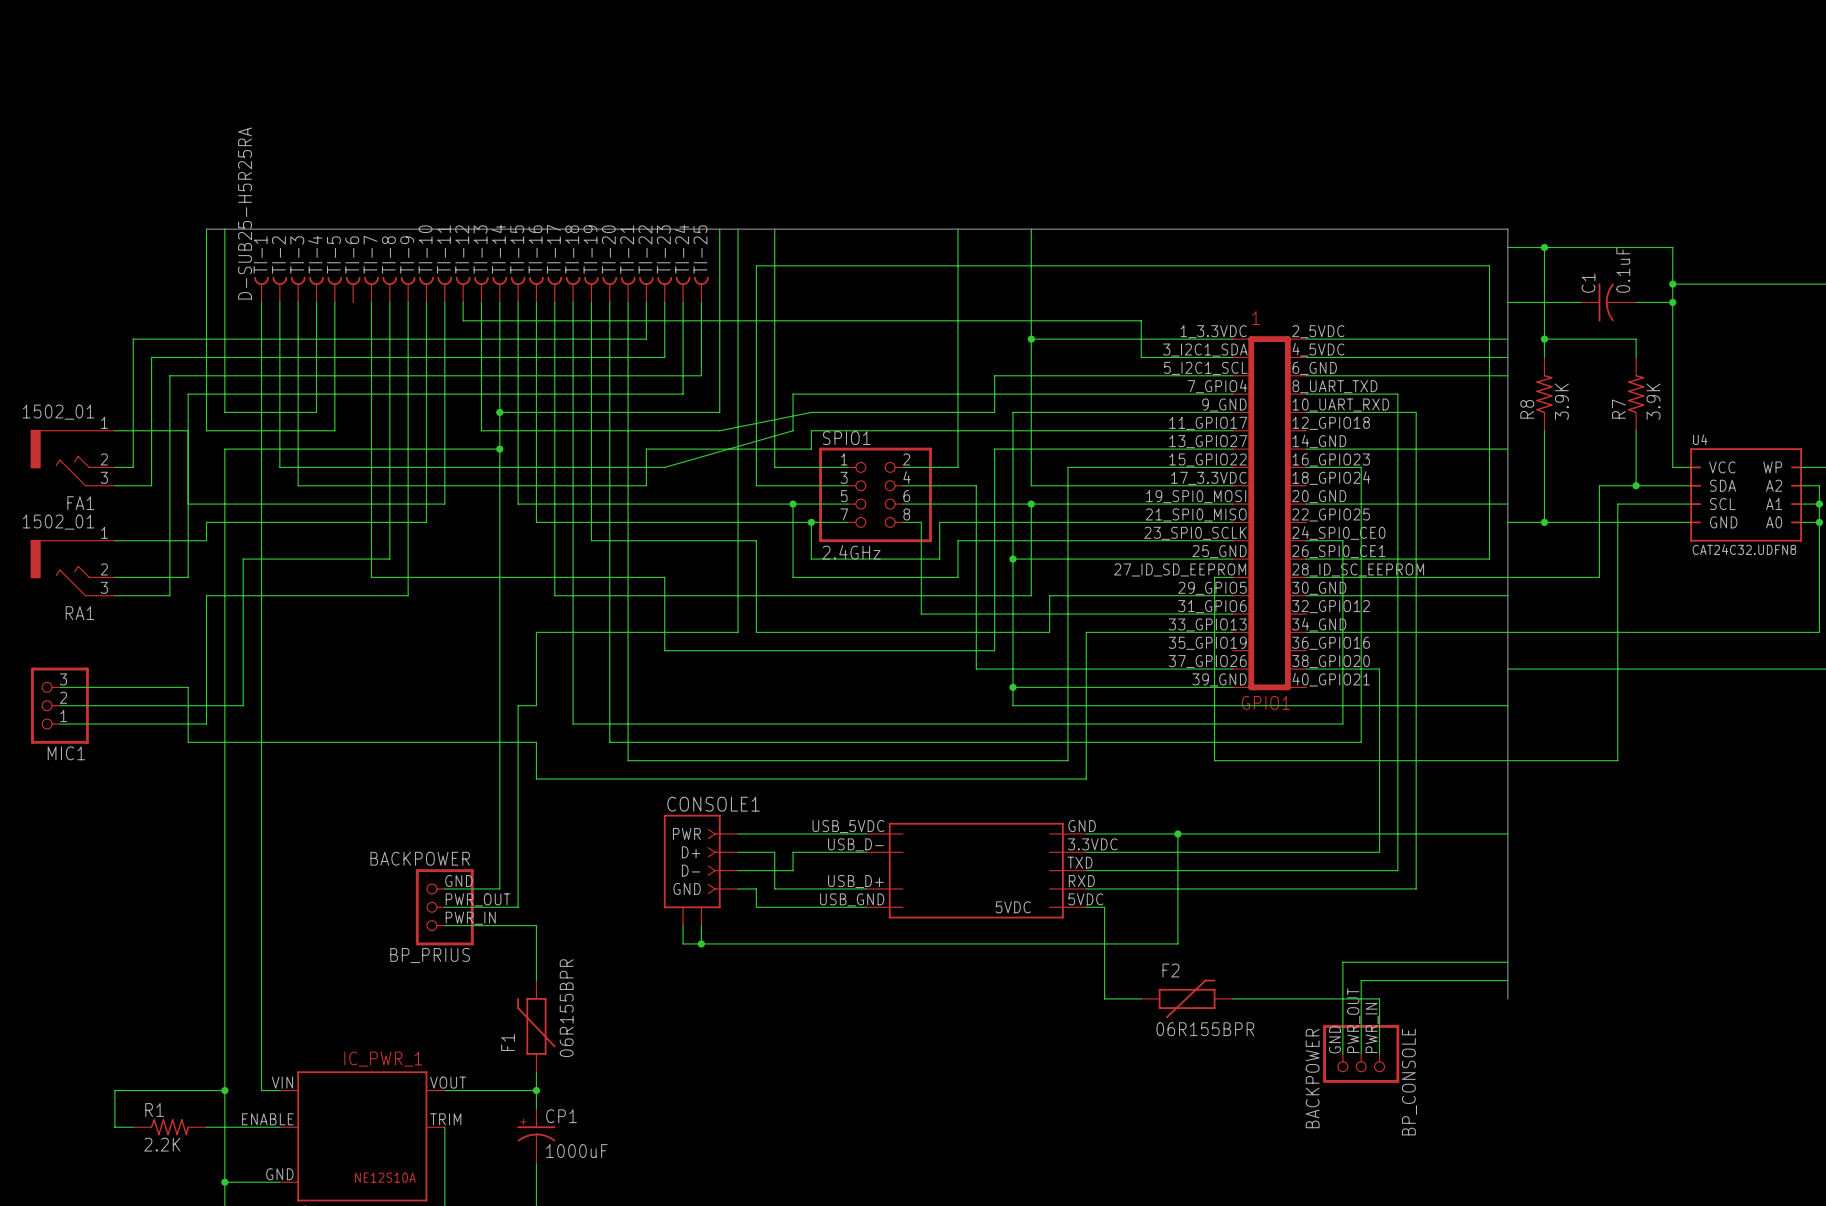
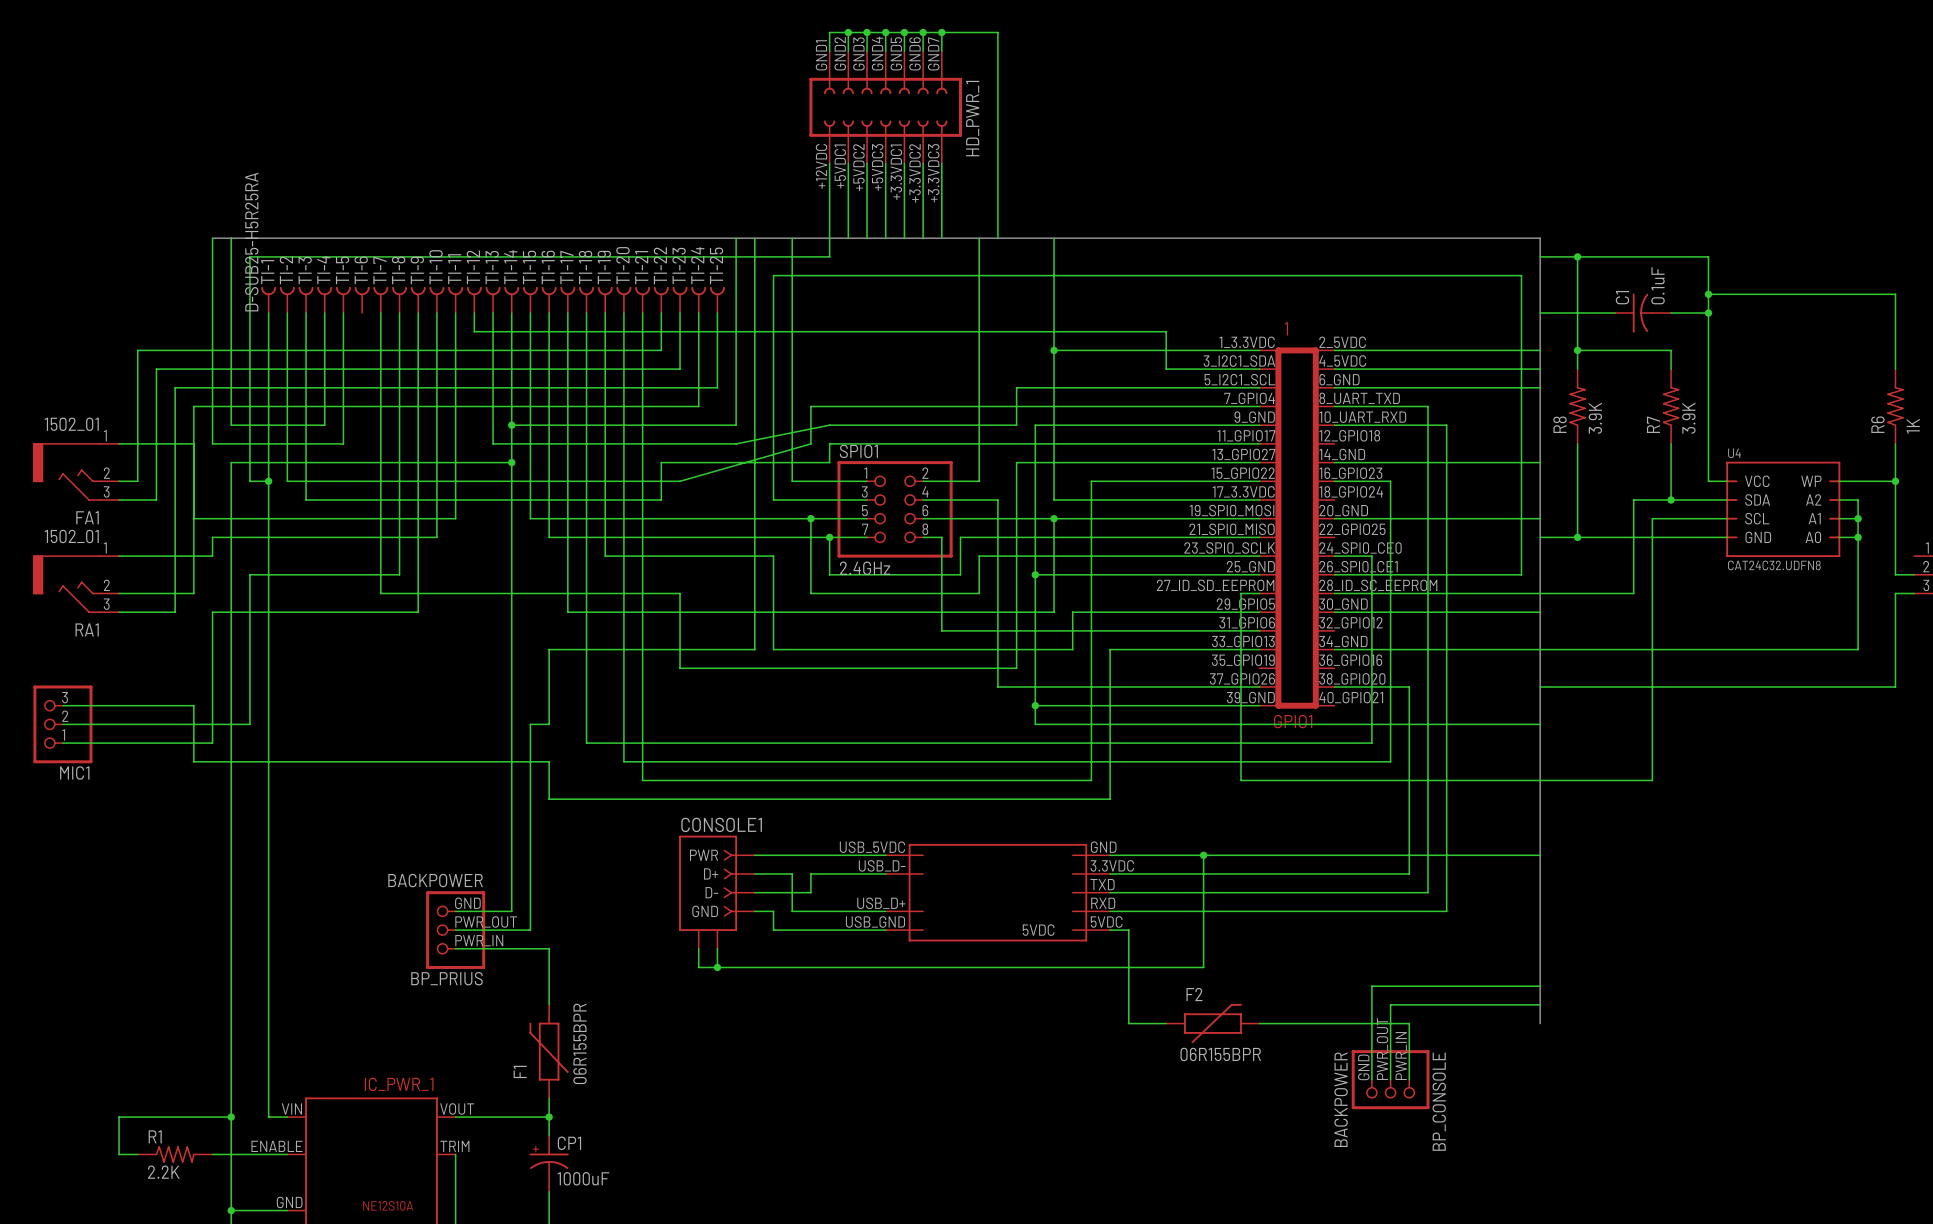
wire: none -> (848, 32) (848, 51)
junction: none -> (848, 32)
wire: none -> (867, 32) (867, 51)
junction: none -> (867, 32)
wire: none -> (885, 32) (885, 51)
junction: none -> (885, 32)
wire: none -> (904, 32) (904, 51)
junction: none -> (904, 32)
wire: none -> (923, 32) (923, 51)
junction: none -> (923, 32)
wire: none -> (941, 32) (941, 51)
junction: none -> (941, 32)
wire: none -> (829, 51) (829, 32) (997, 32) (997, 238)
HD_PWR_1: none -> (885, 107)
wire: none -> (829, 163) (829, 256) (249, 256) (249, 481) (268, 481)
wire: none -> (848, 163) (848, 238)
wire: none -> (867, 163) (867, 238)
wire: none -> (885, 163) (885, 238)
wire: none -> (904, 163) (904, 238)
wire: none -> (923, 163) (923, 238)
wire: none -> (941, 163) (941, 238)
junction: none -> (268, 481)

